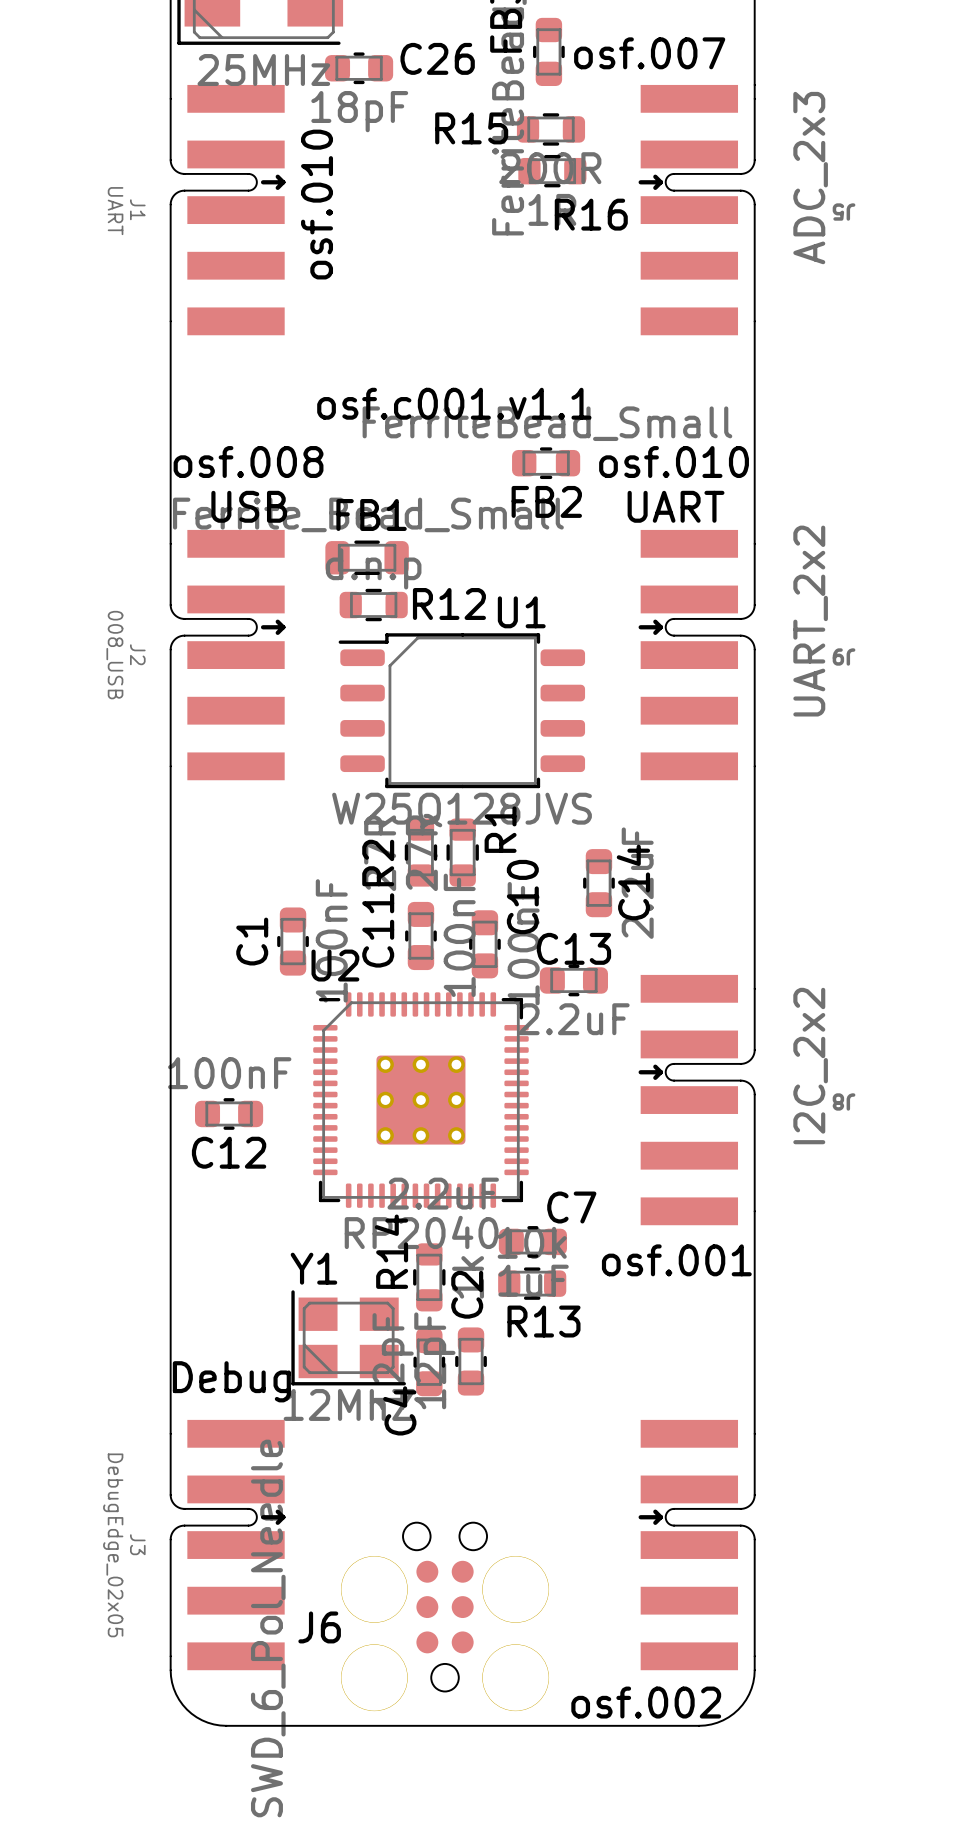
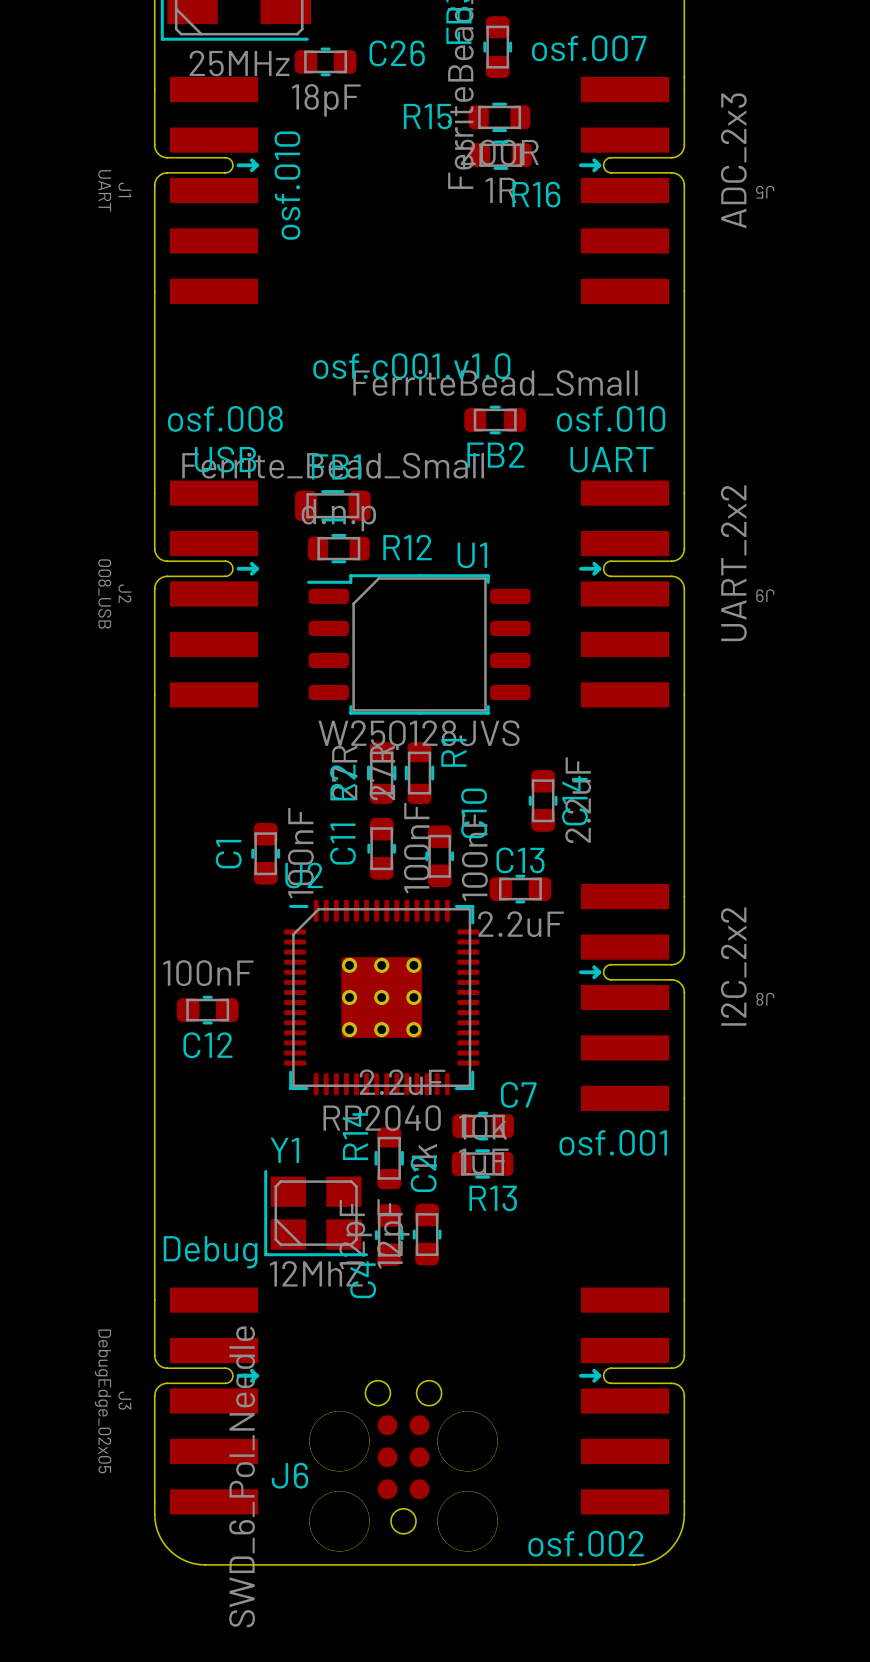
text: osf.c001.v1.1 (454, 403) -> osf.c001.v1.0 (411, 366)

